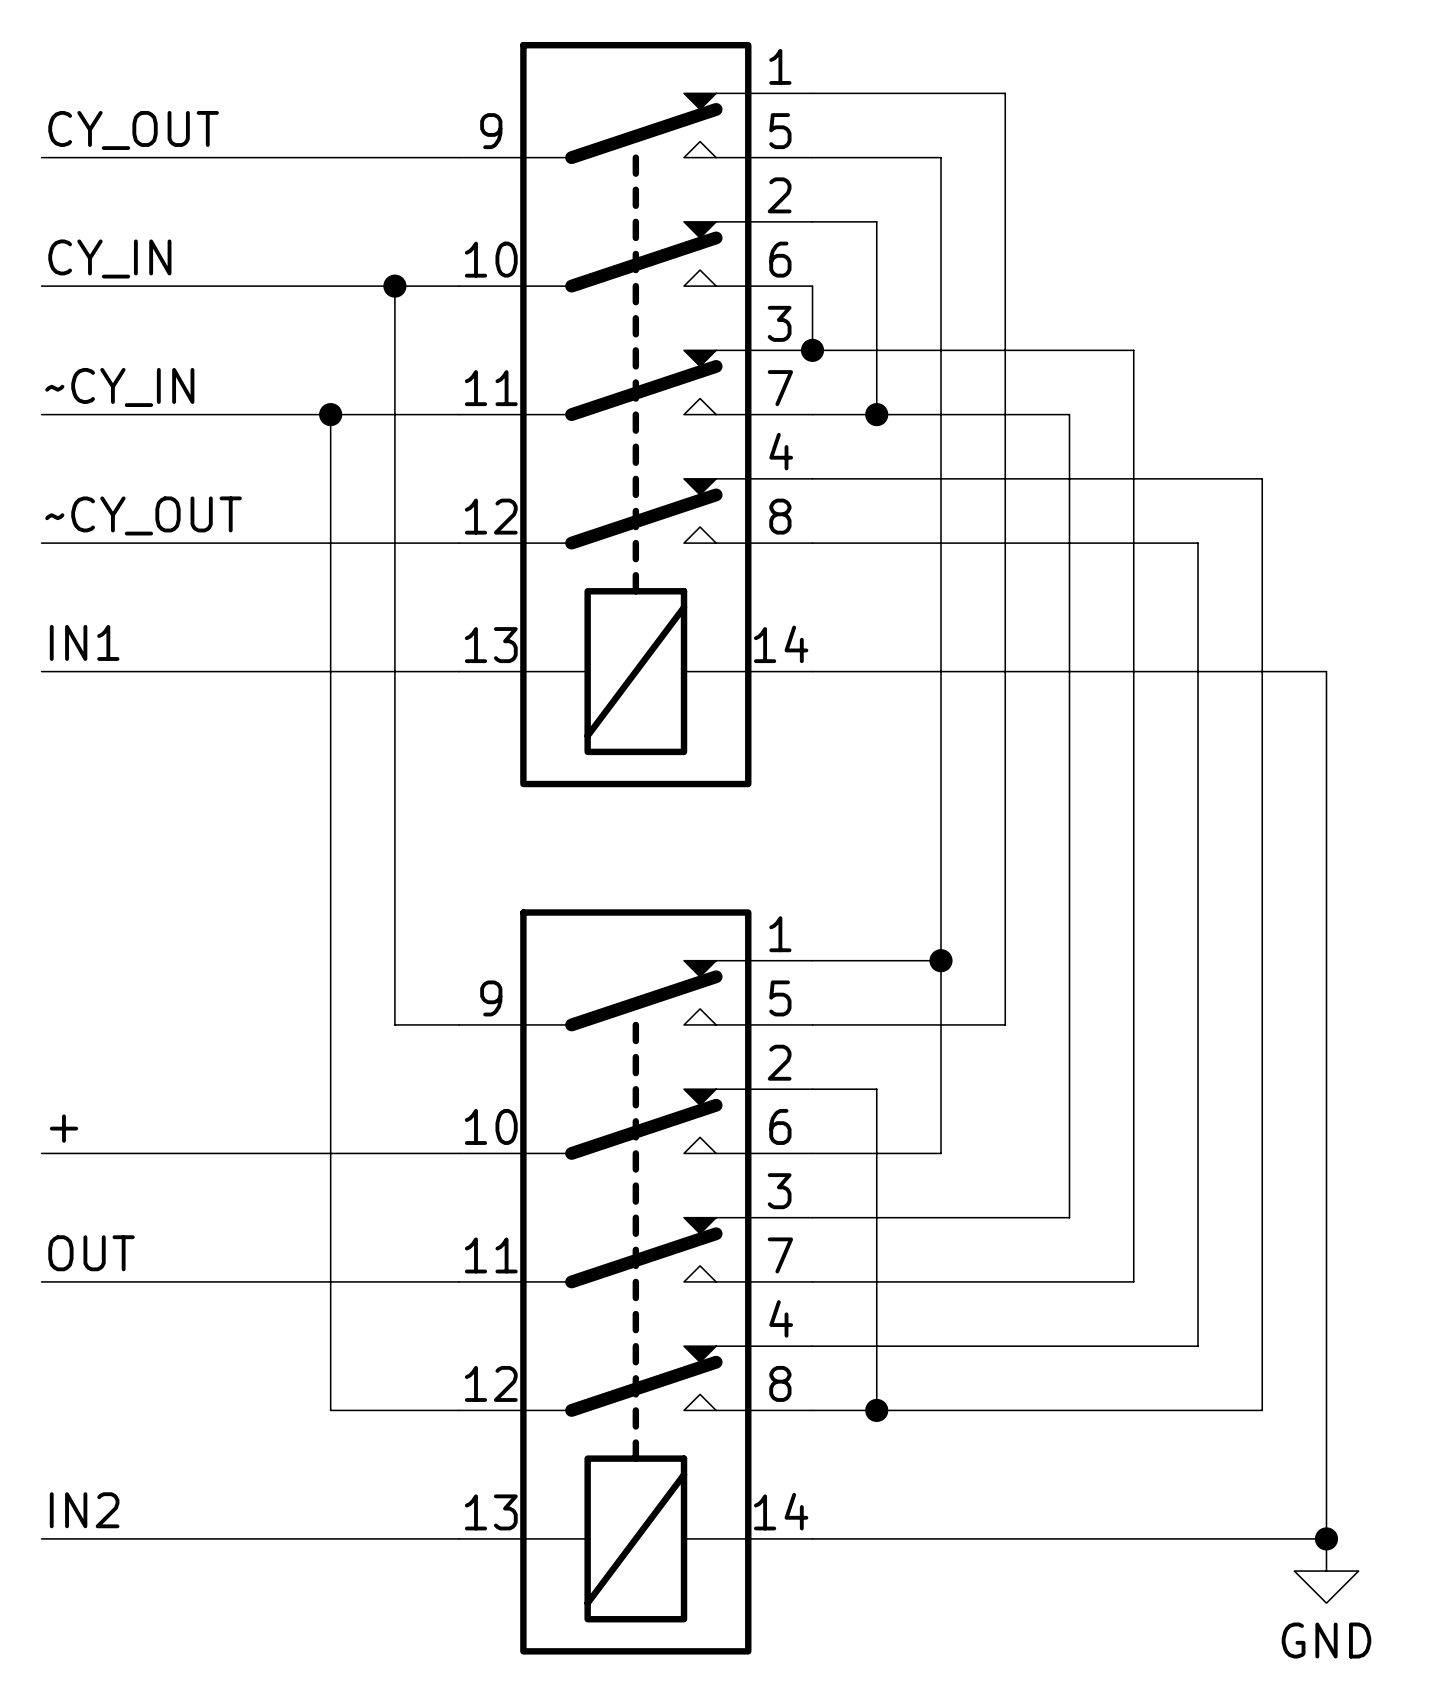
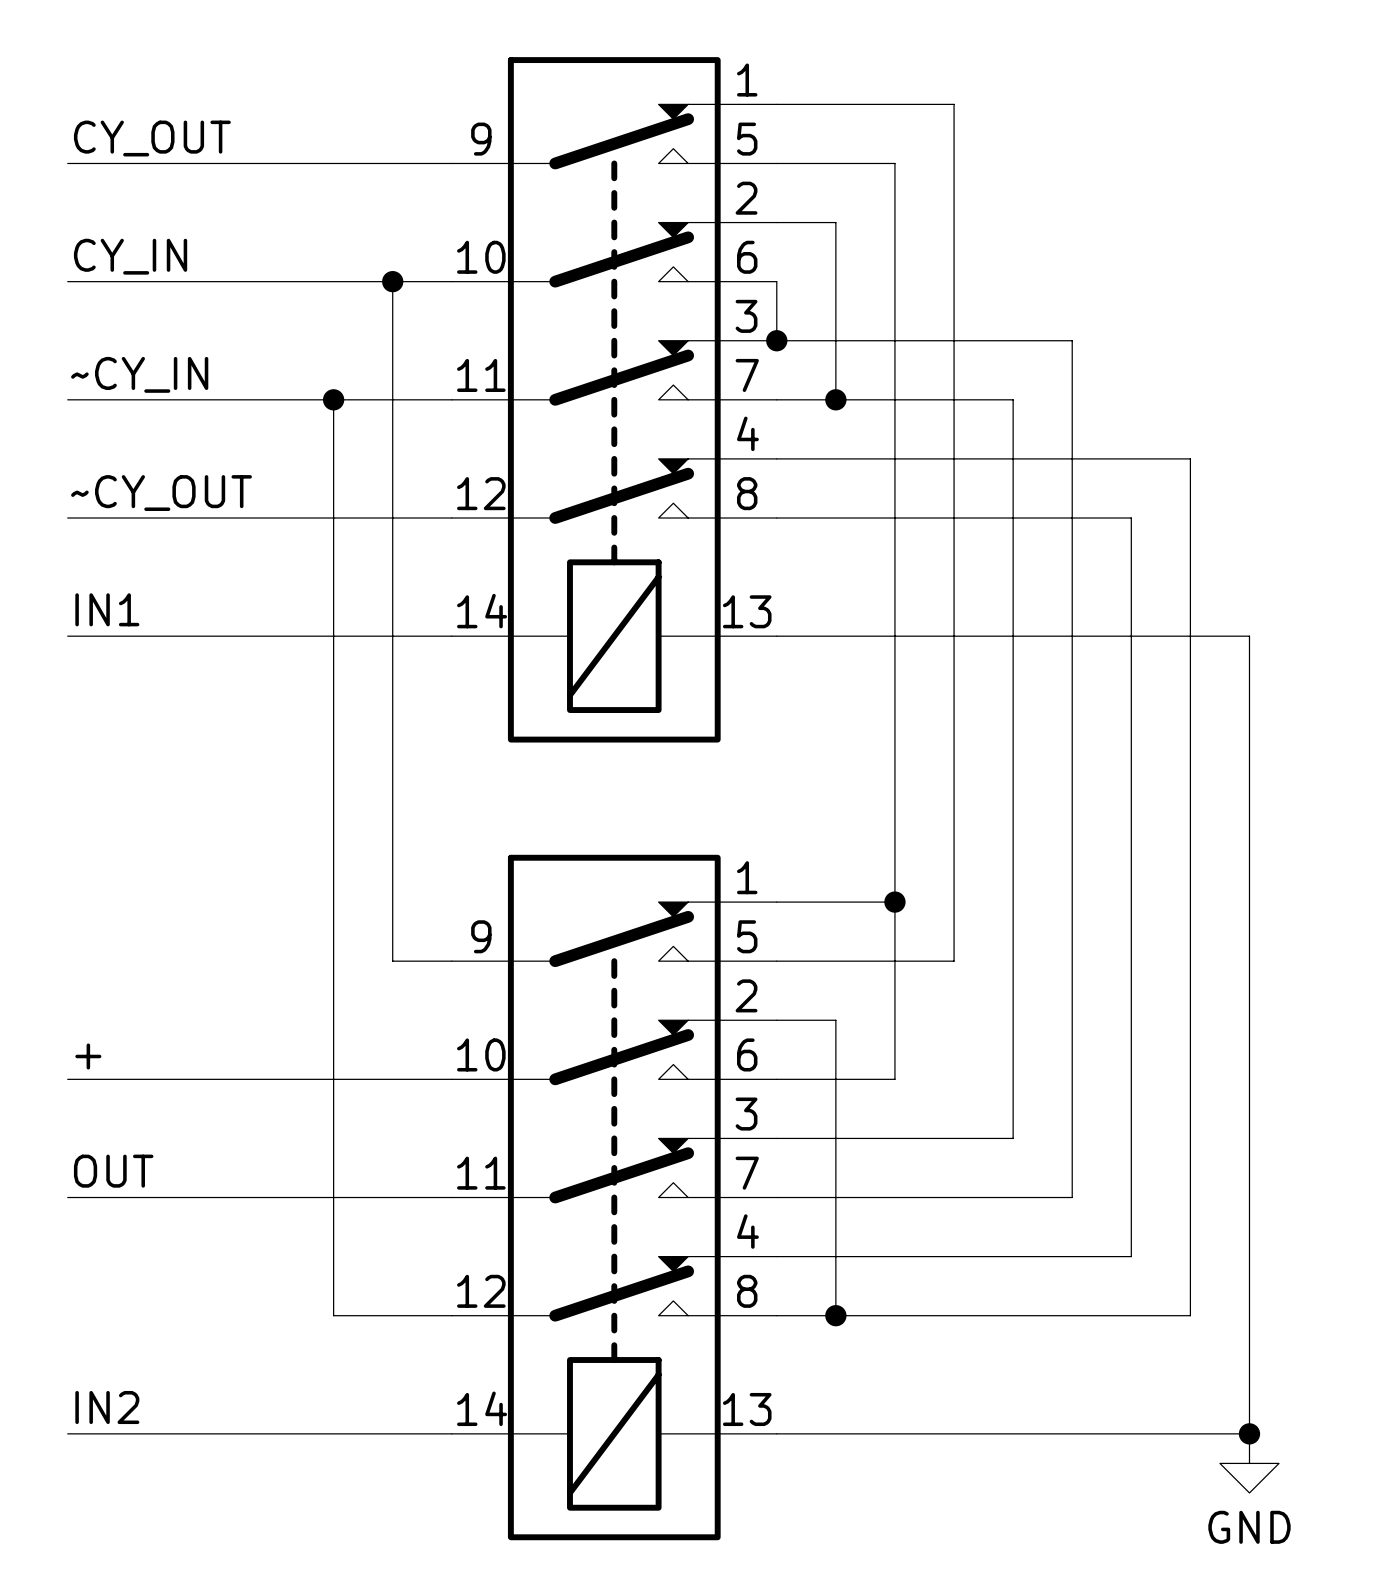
part pin number: 14 (781, 644) -> 13 (747, 611)
part pin number: 13 (491, 645) -> 14 (482, 611)
part pin number: 14 (781, 1511) -> 13 (747, 1409)
part pin number: 13 (491, 1512) -> 14 (482, 1408)

